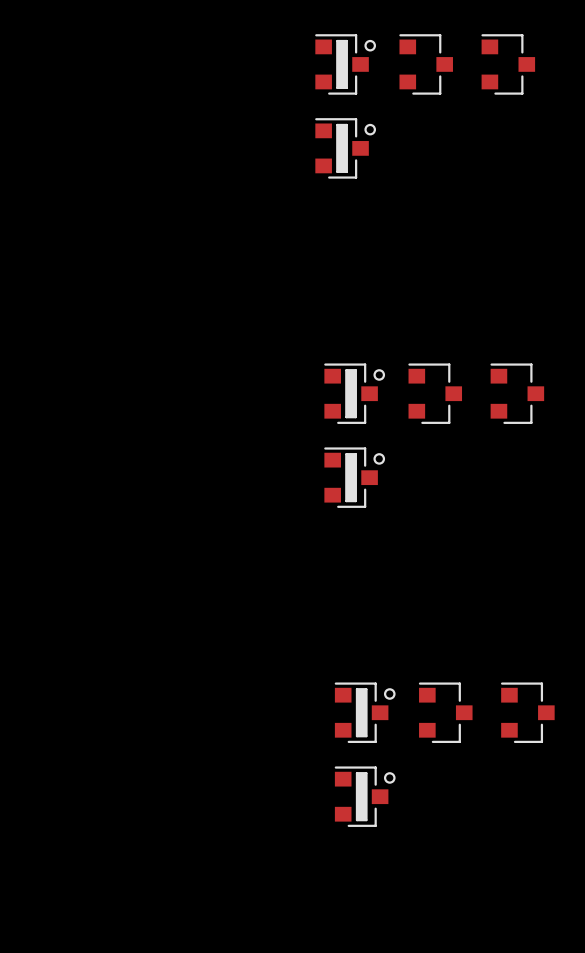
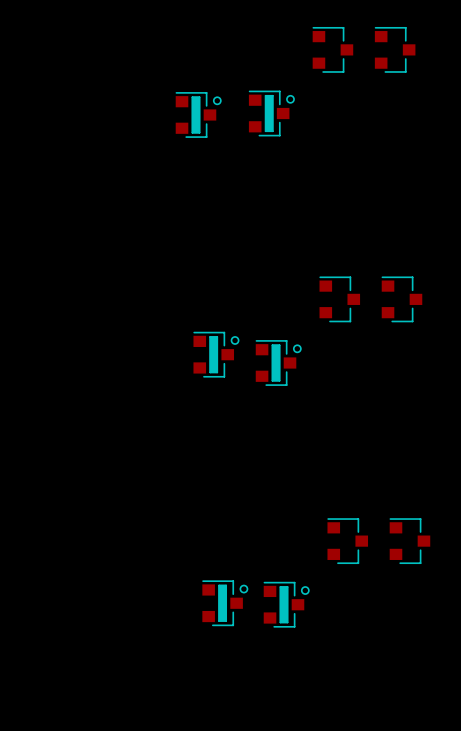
part position: (345, 64) -> (198, 114)
part position: (354, 393) -> (216, 354)
part position: (365, 712) -> (225, 603)

